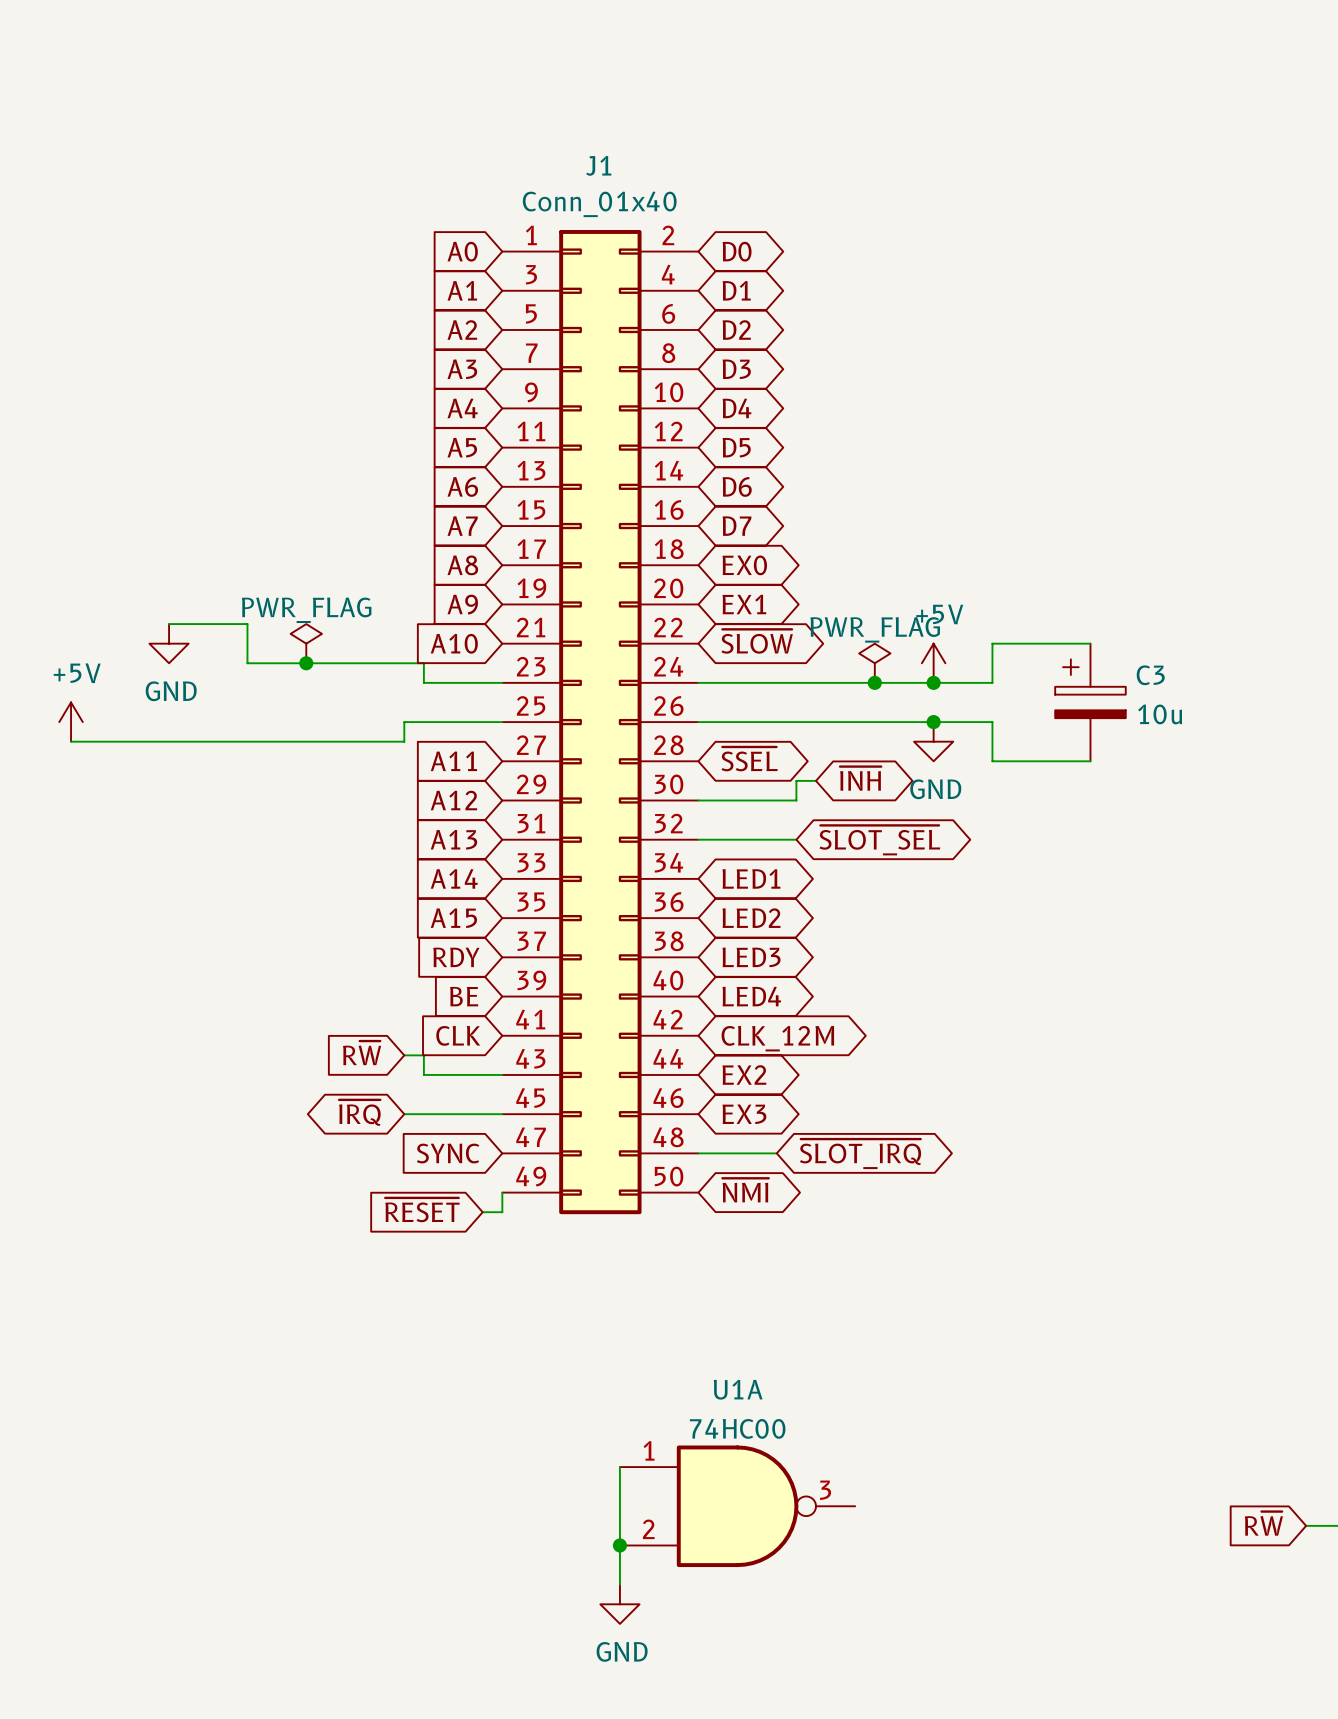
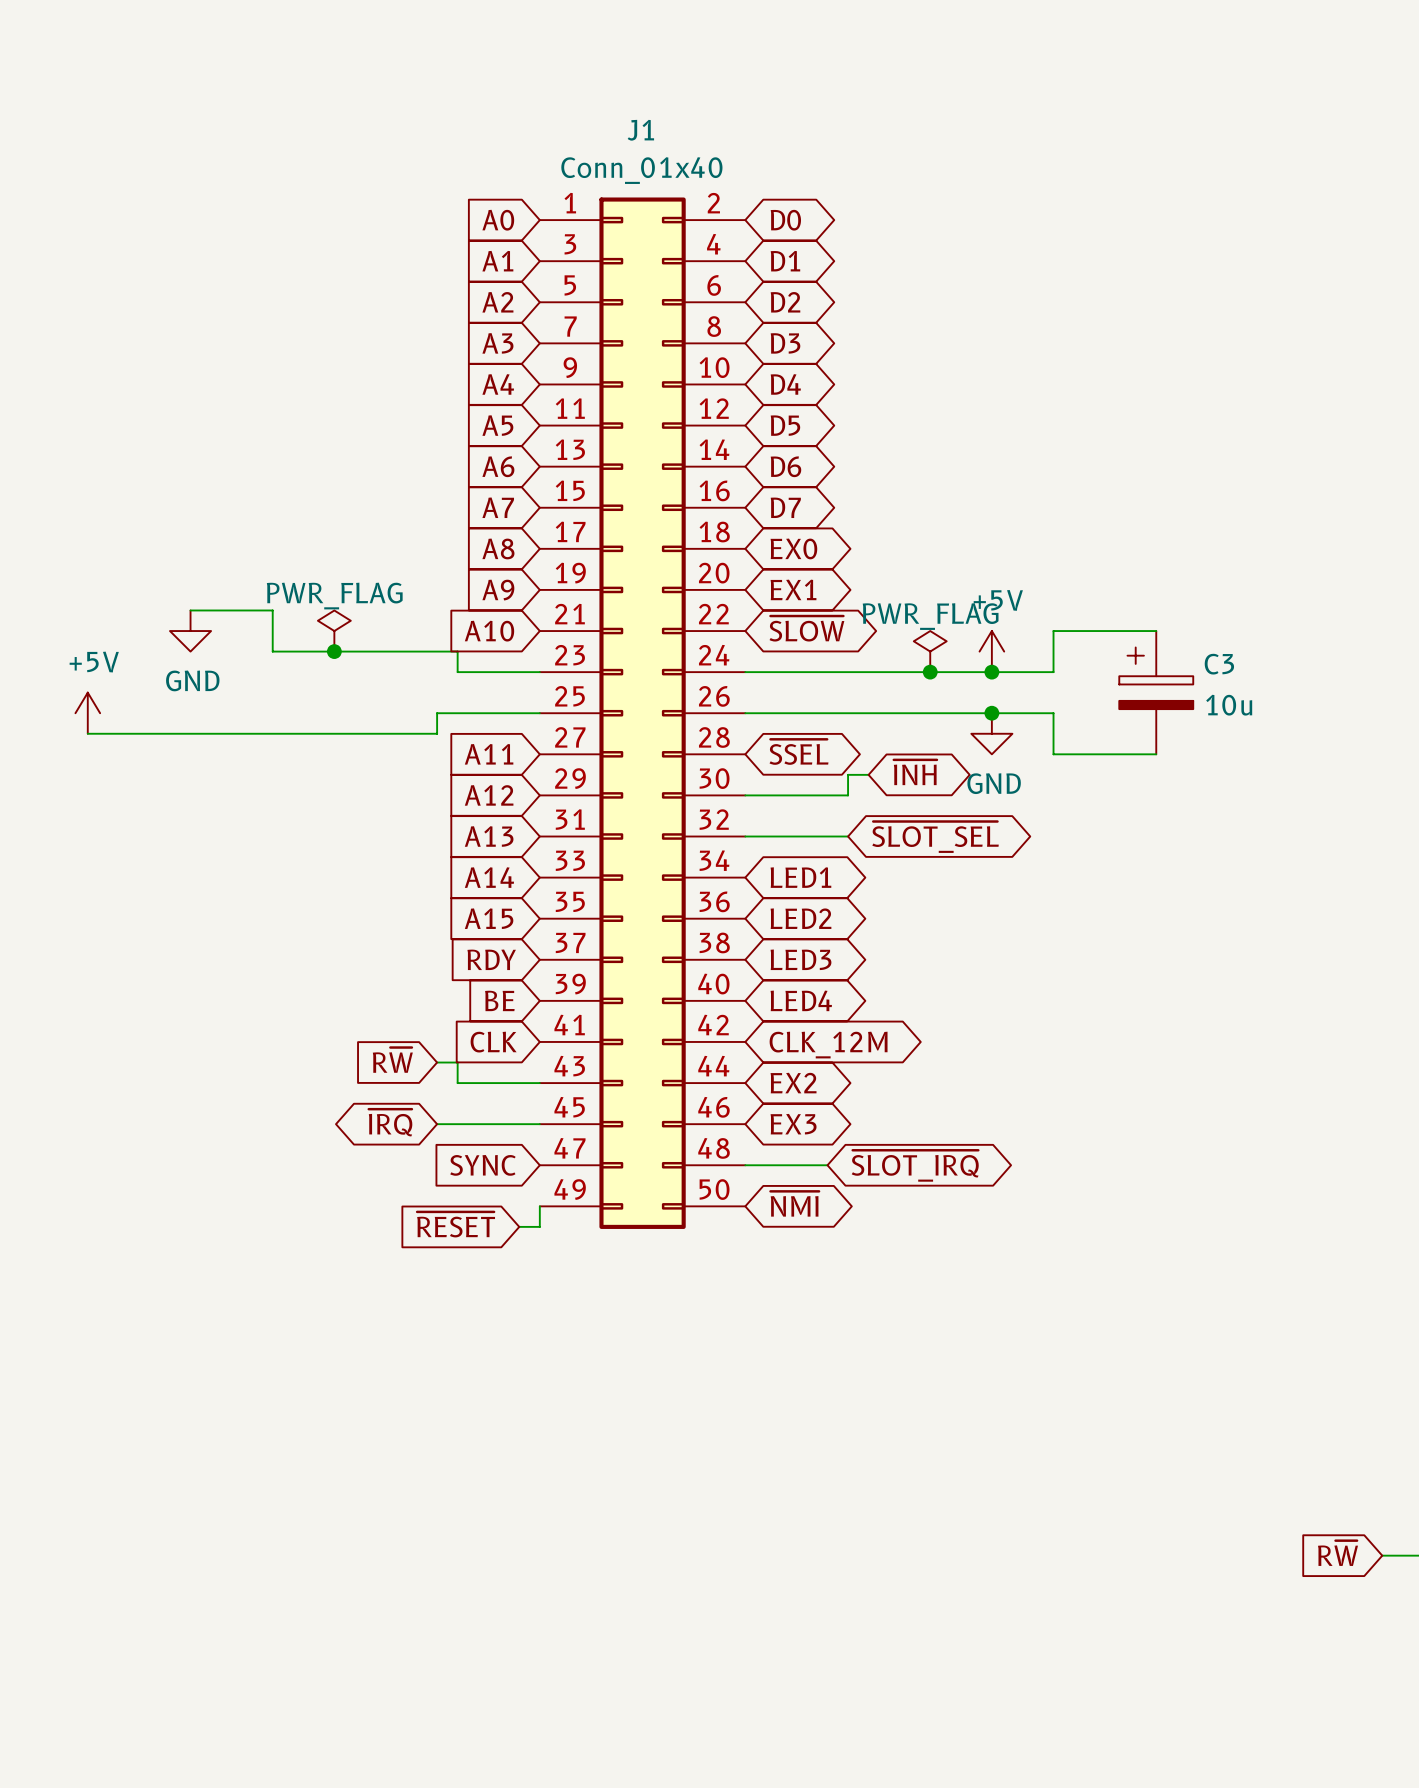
wire: (619, 1467) (619, 1584) -> none
U1A: 74HC00 (737, 1506) -> none
junction: (619, 1545) -> none
power symbol: GND (619, 1604) -> none

